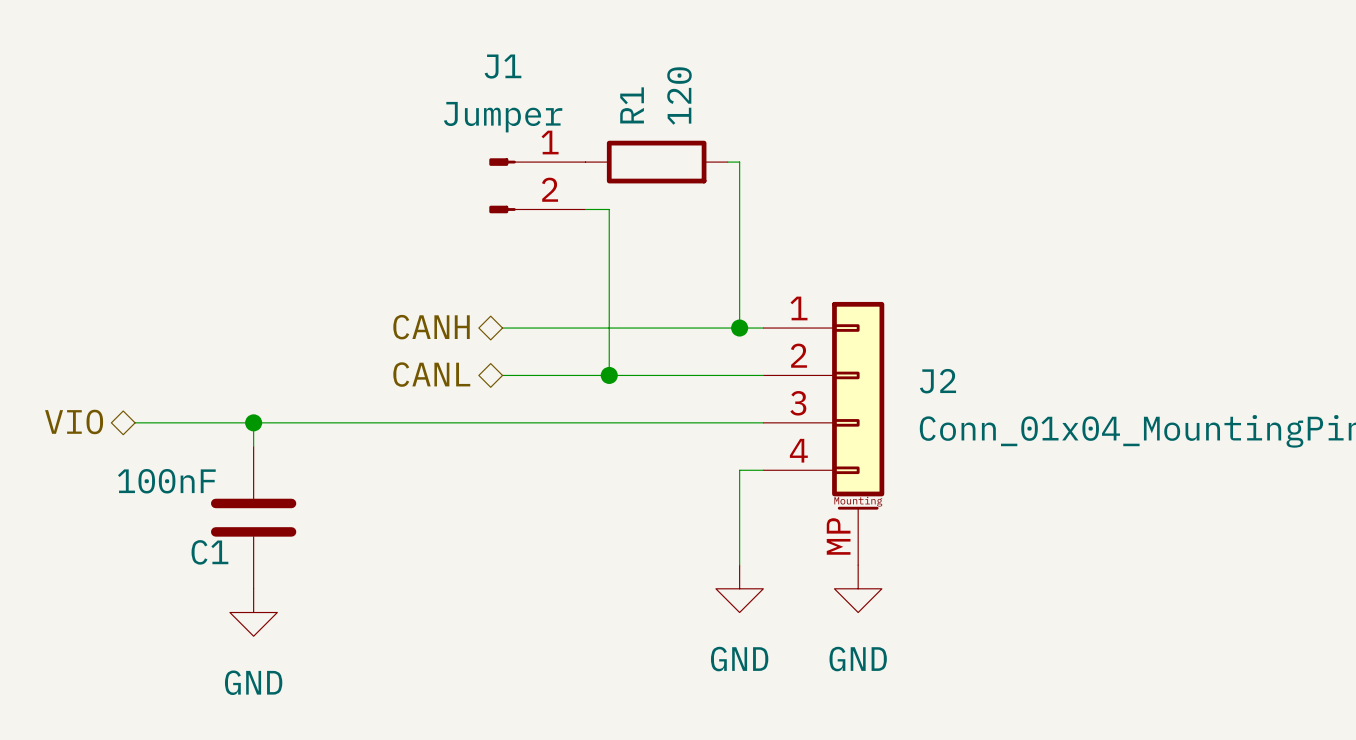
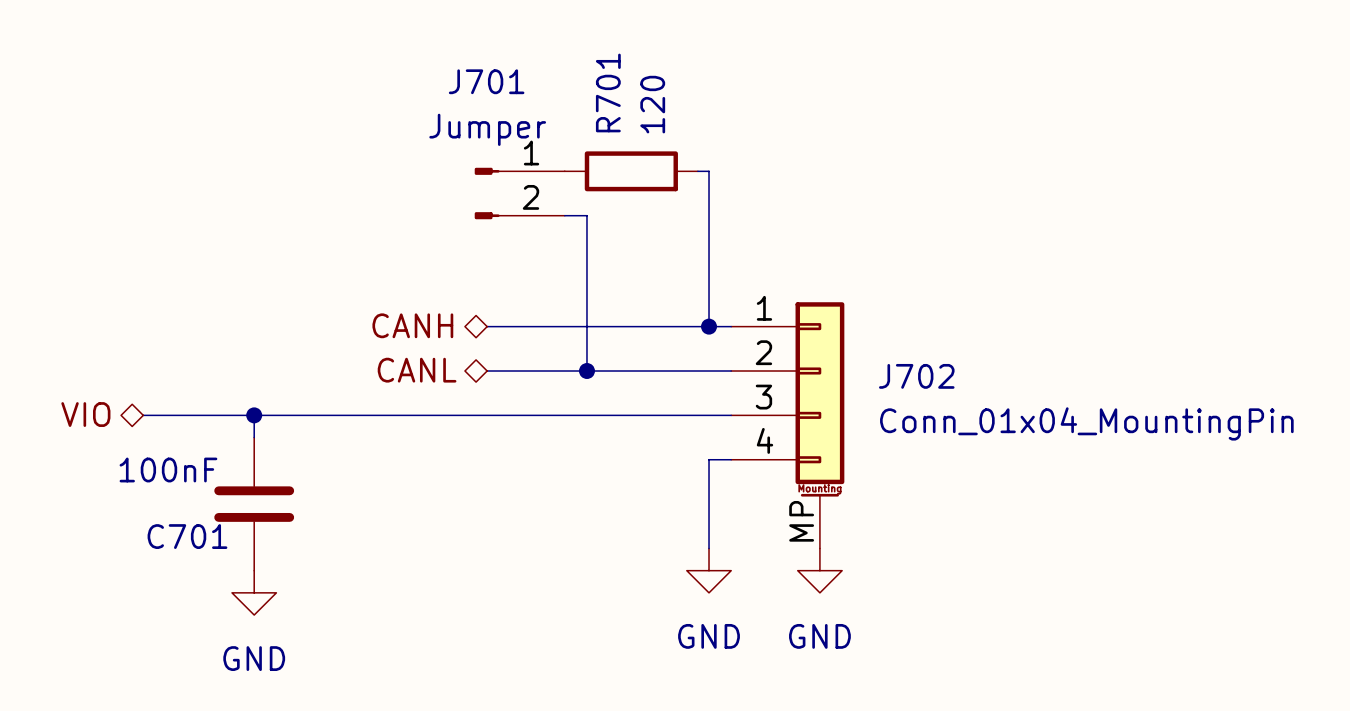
J1 name: J1 (503, 66) -> J701 (486, 81)
R1 name: R1 (632, 105) -> R701 (608, 92)
J2 name: J2 (938, 381) -> J702 (916, 376)
C1 name: C1 (209, 552) -> C701 (187, 536)

